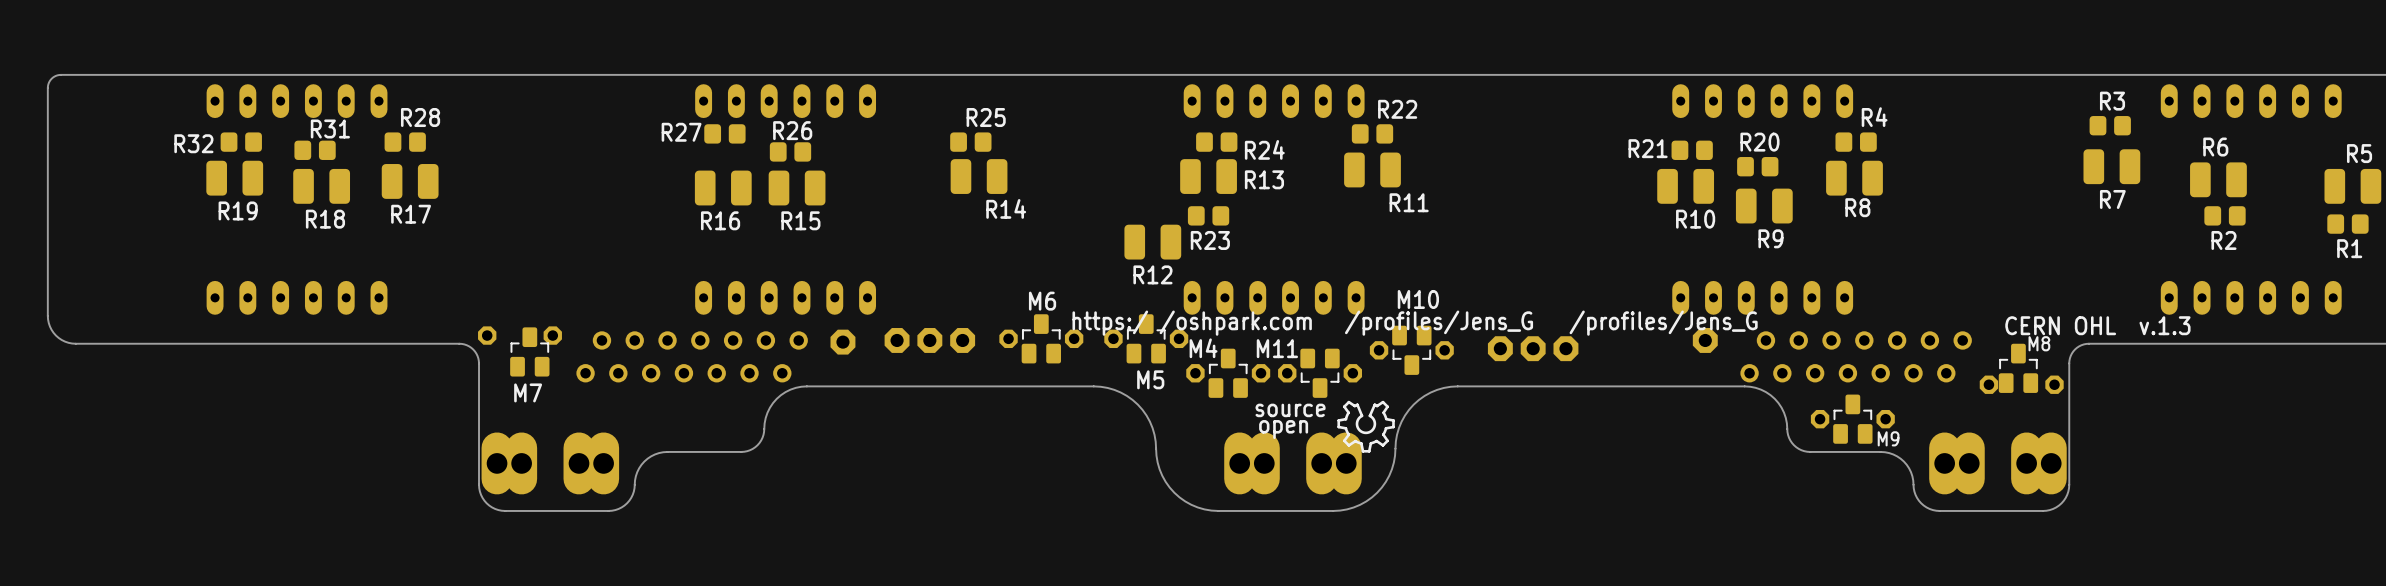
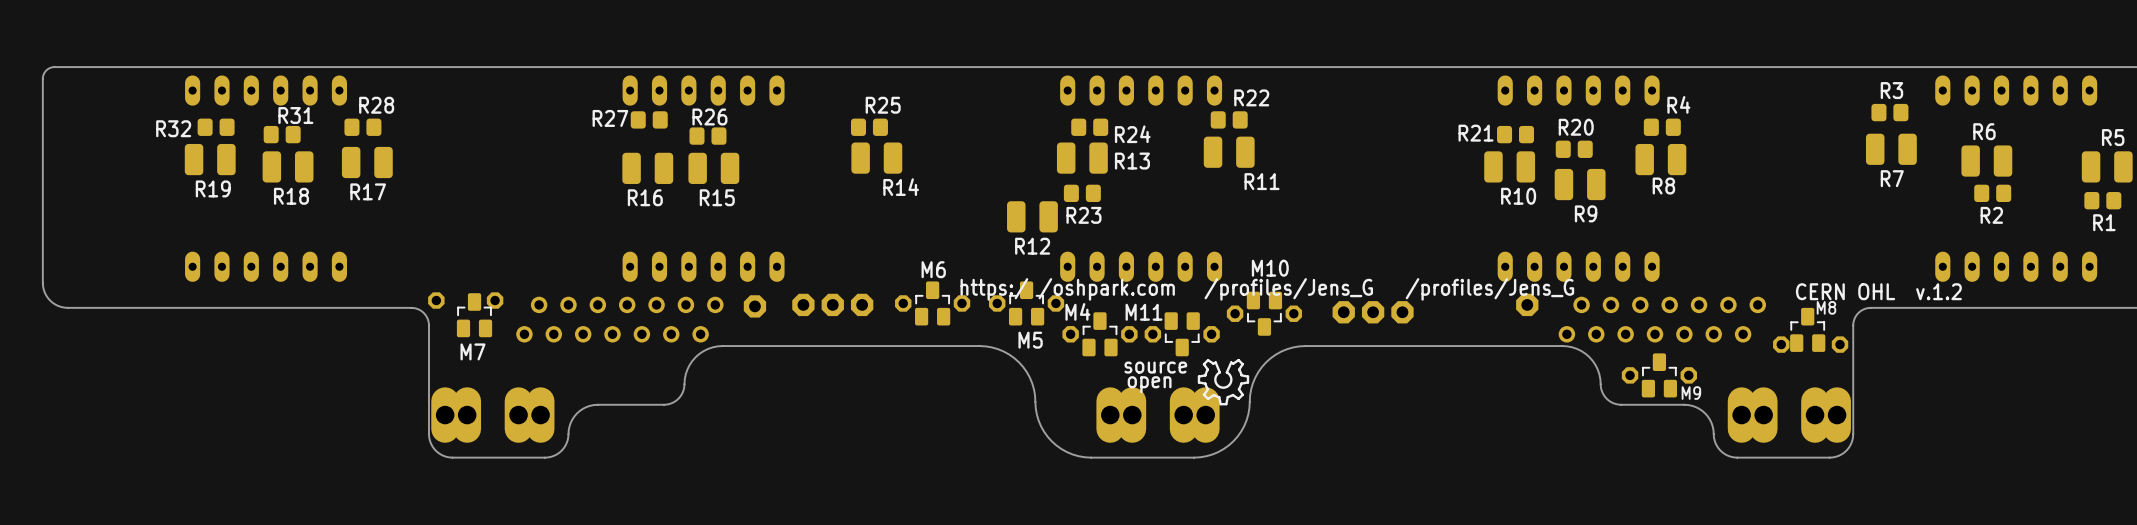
text: CERN OHL v.1.3 (2097, 325) -> CERN OHL v.1.2 (1878, 291)

